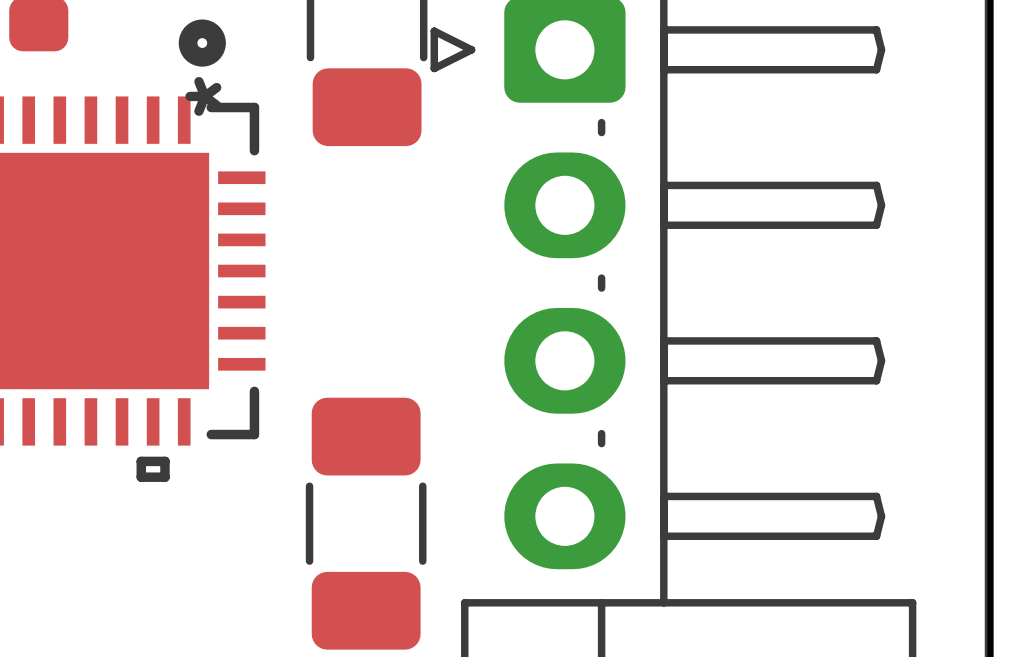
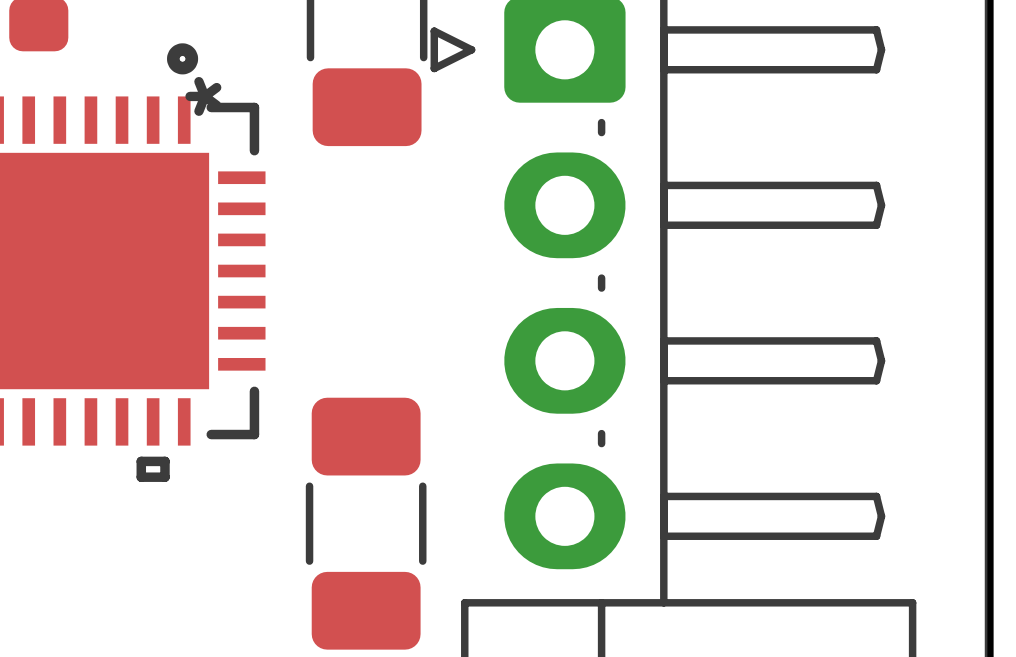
drawing shape: [178, 19, 226, 67] -> [167, 43, 199, 75]

